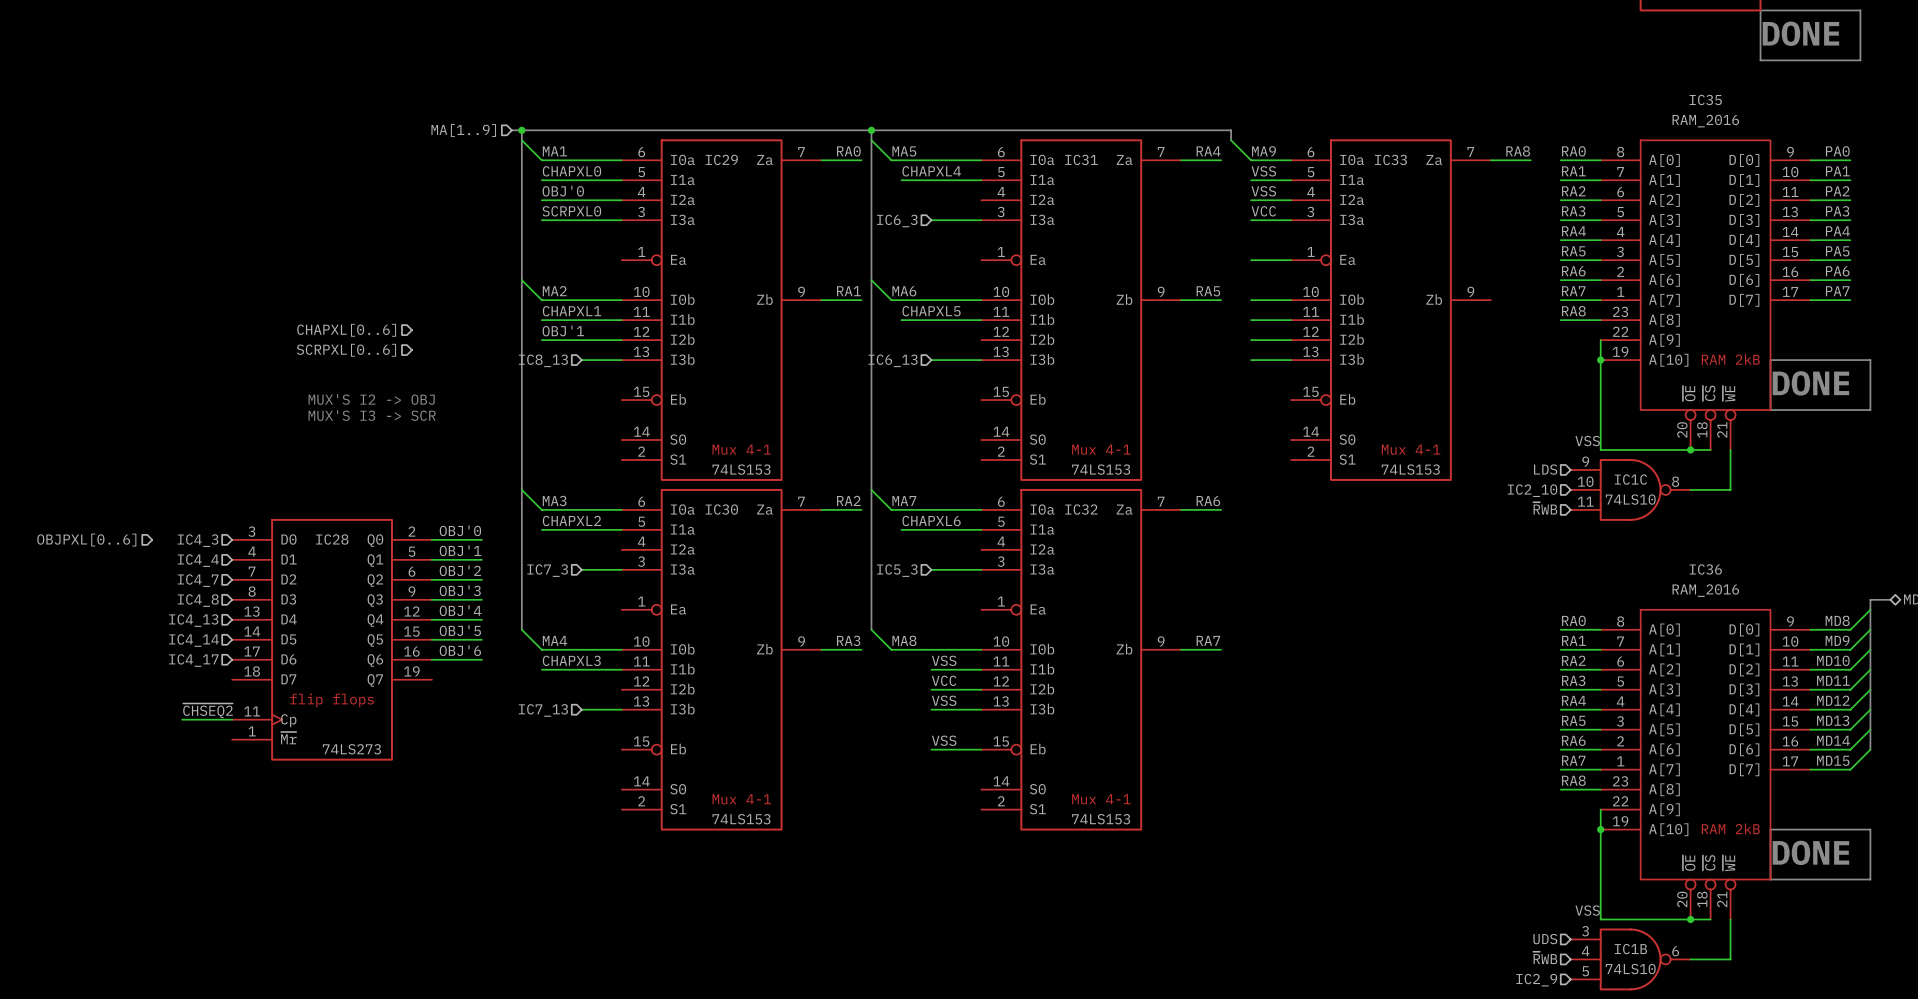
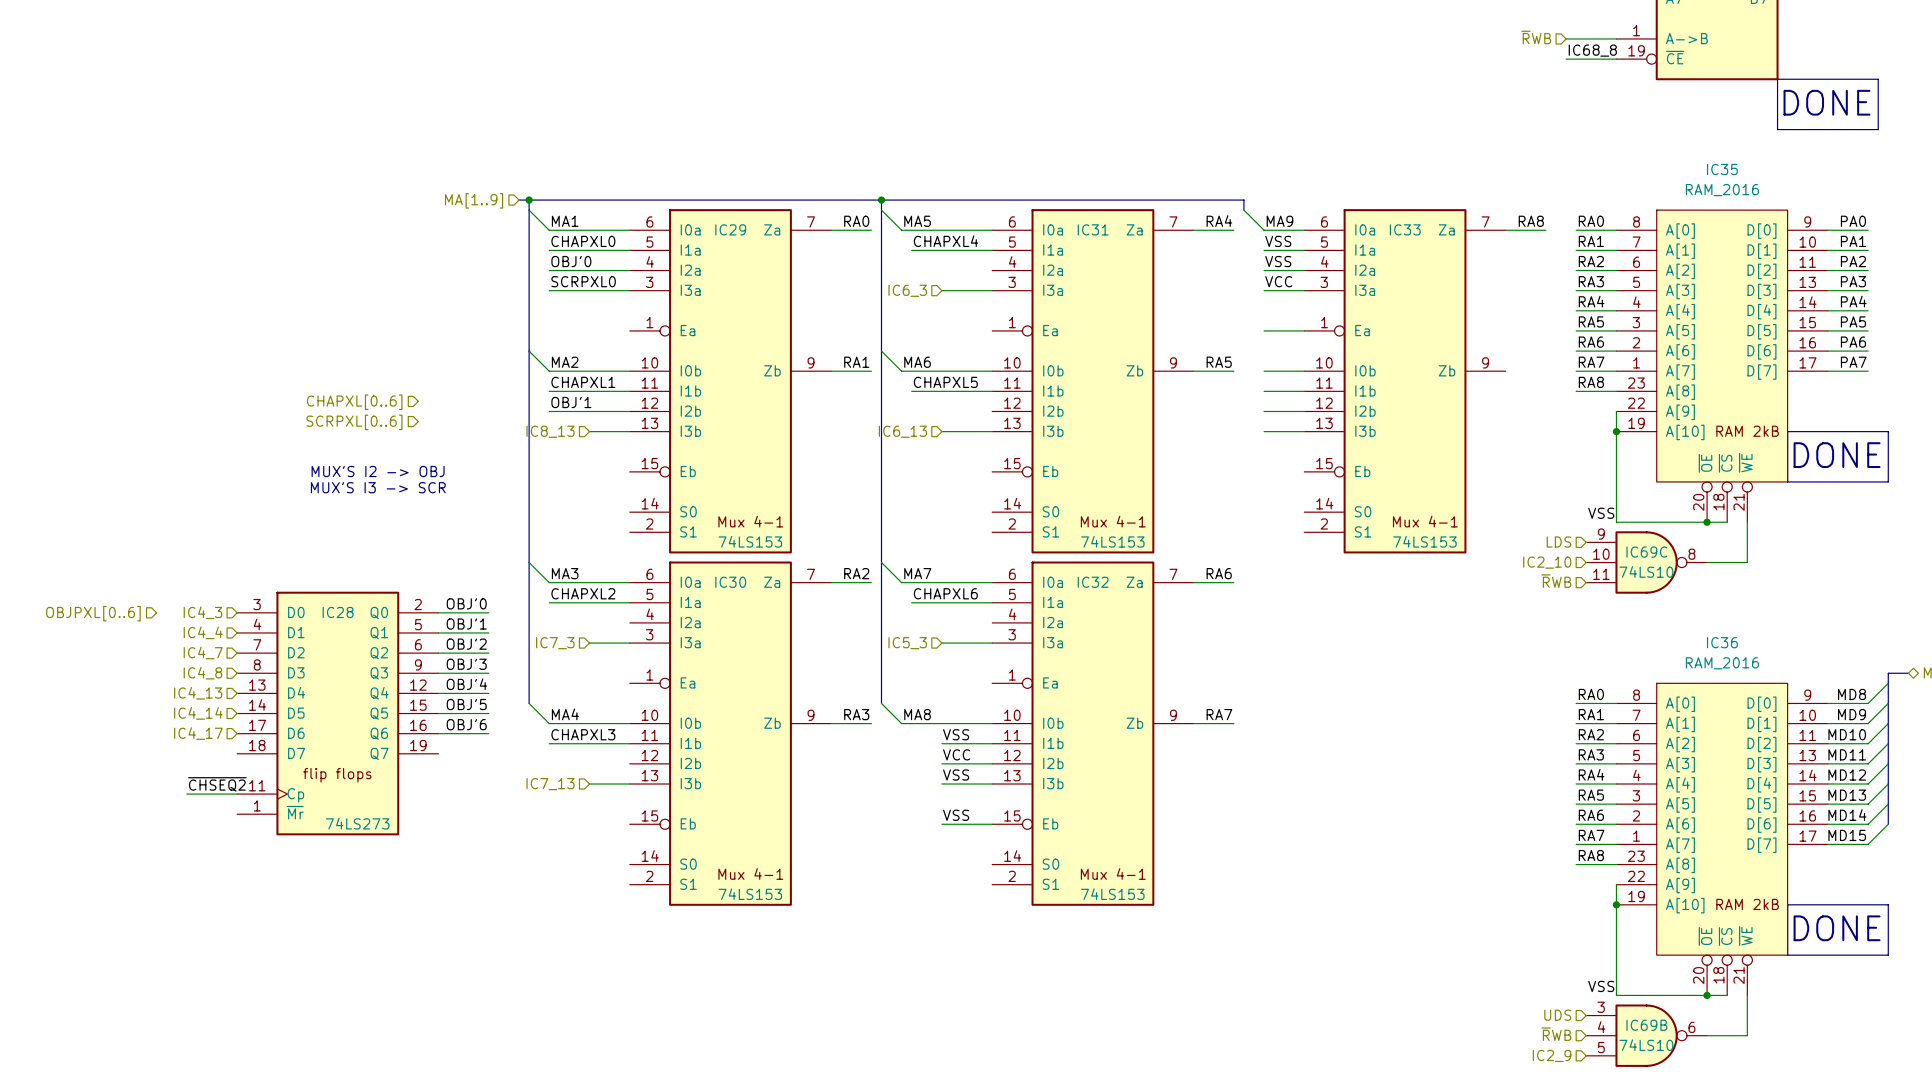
IC1C name: IC1C (1630, 479) -> IC69C (1646, 552)
IC1B name: IC1B (1630, 949) -> IC69B (1646, 1025)

